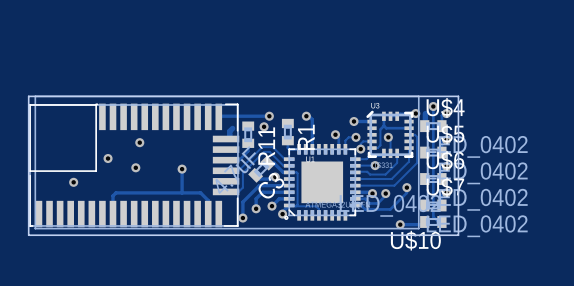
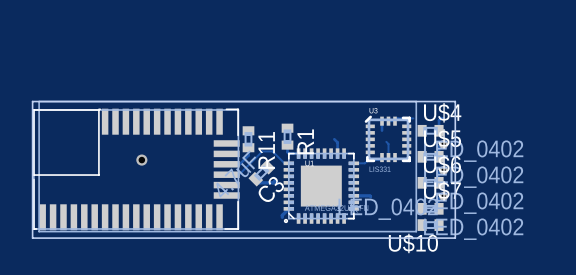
track: (433, 106) (433, 216) (438, 222) (441, 222) -> none
via: (433, 106) -> none
via: (415, 113) -> none
track: (425, 113) (424, 126) -> none
via: (446, 113) -> none
track: (269, 116) (218, 116) -> none
via: (269, 116) -> none
track: (306, 116) (312, 119) (312, 149) -> none
via: (306, 116) -> none
track: (353, 121) (371, 121) -> none
via: (353, 121) -> none
via: (264, 126) -> none
track: (232, 128) (229, 131) (229, 137) -> none
track: (409, 128) (386, 128) (383, 125) (380, 129) (380, 145) (377, 148) (372, 148) -> none
via: (335, 134) -> none
track: (409, 134) (417, 136) (417, 162) (394, 185) (355, 185) -> none
track: (355, 137) (348, 137) (345, 140) (346, 147) -> none
via: (355, 137) -> none
via: (388, 137) -> none
track: (372, 141) (363, 141) (360, 143) (360, 149) -> none
via: (139, 142) -> none
track: (409, 148) (409, 161) (391, 179) (355, 179) -> none
via: (360, 149) -> none
track: (397, 153) (397, 162) (385, 174) (355, 172) -> none
via: none -> (141, 160)
via: (108, 158) -> none
track: (267, 163) (274, 163) (283, 172) (297, 173) (297, 204) (295, 206) -> none
track: (289, 165) (283, 165) (269, 151) (264, 151) (242, 173) (242, 187) (238, 191) (226, 191) -> none
track: (375, 165) (356, 166) -> none
via: (375, 165) -> none
via: (135, 167) -> none
track: (182, 169) (182, 192) -> none
via: (182, 169) -> none
via: (275, 177) -> none
via: (73, 182) -> none
track: (289, 185) (259, 185) (242, 202) (242, 218) -> none
track: (406, 187) (406, 192) (390, 209) (365, 209) (361, 205) (355, 205) -> none
via: (406, 187) -> none
track: (289, 192) (262, 192) (256, 198) (256, 208) -> none
via: (372, 193) -> none
track: (385, 193) (377, 203) (369, 203) (365, 198) (355, 198) -> none
via: (385, 193) -> none
track: (289, 198) (279, 198) (272, 206) -> none
track: (292, 205) (289, 205) (315, 206) (318, 209) (318, 215) -> none
via: (272, 206) -> none
via: (256, 208) -> none
track: (113, 214) (113, 195) (115, 192) (200, 192) (208, 200) (208, 214) -> none
via: (282, 214) -> none
via: (242, 218) -> none
track: (424, 222) (422, 224) (400, 224) -> none
via: (400, 224) -> none

